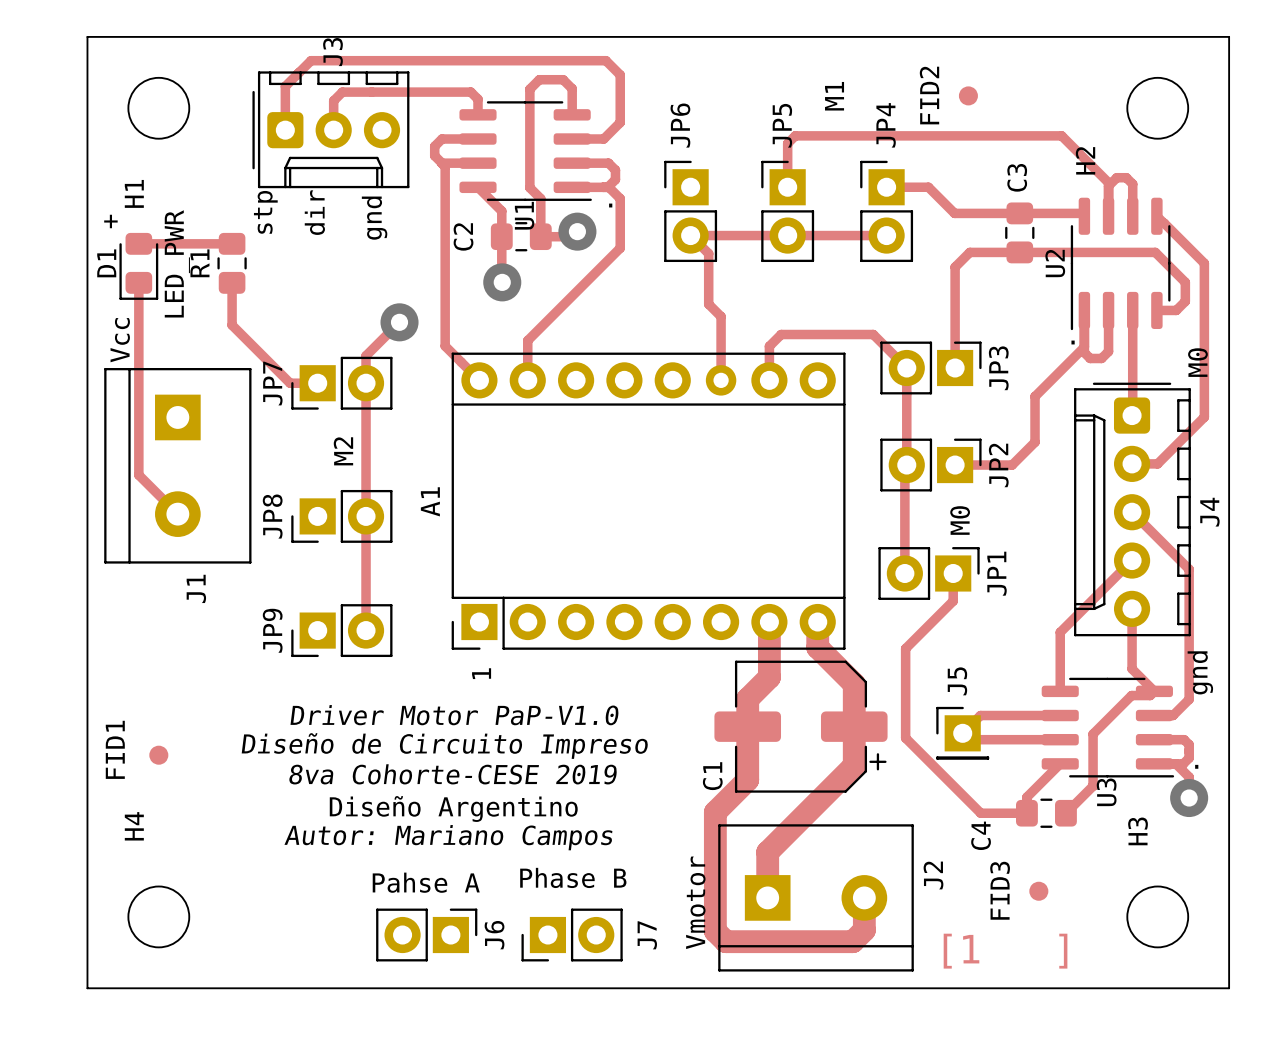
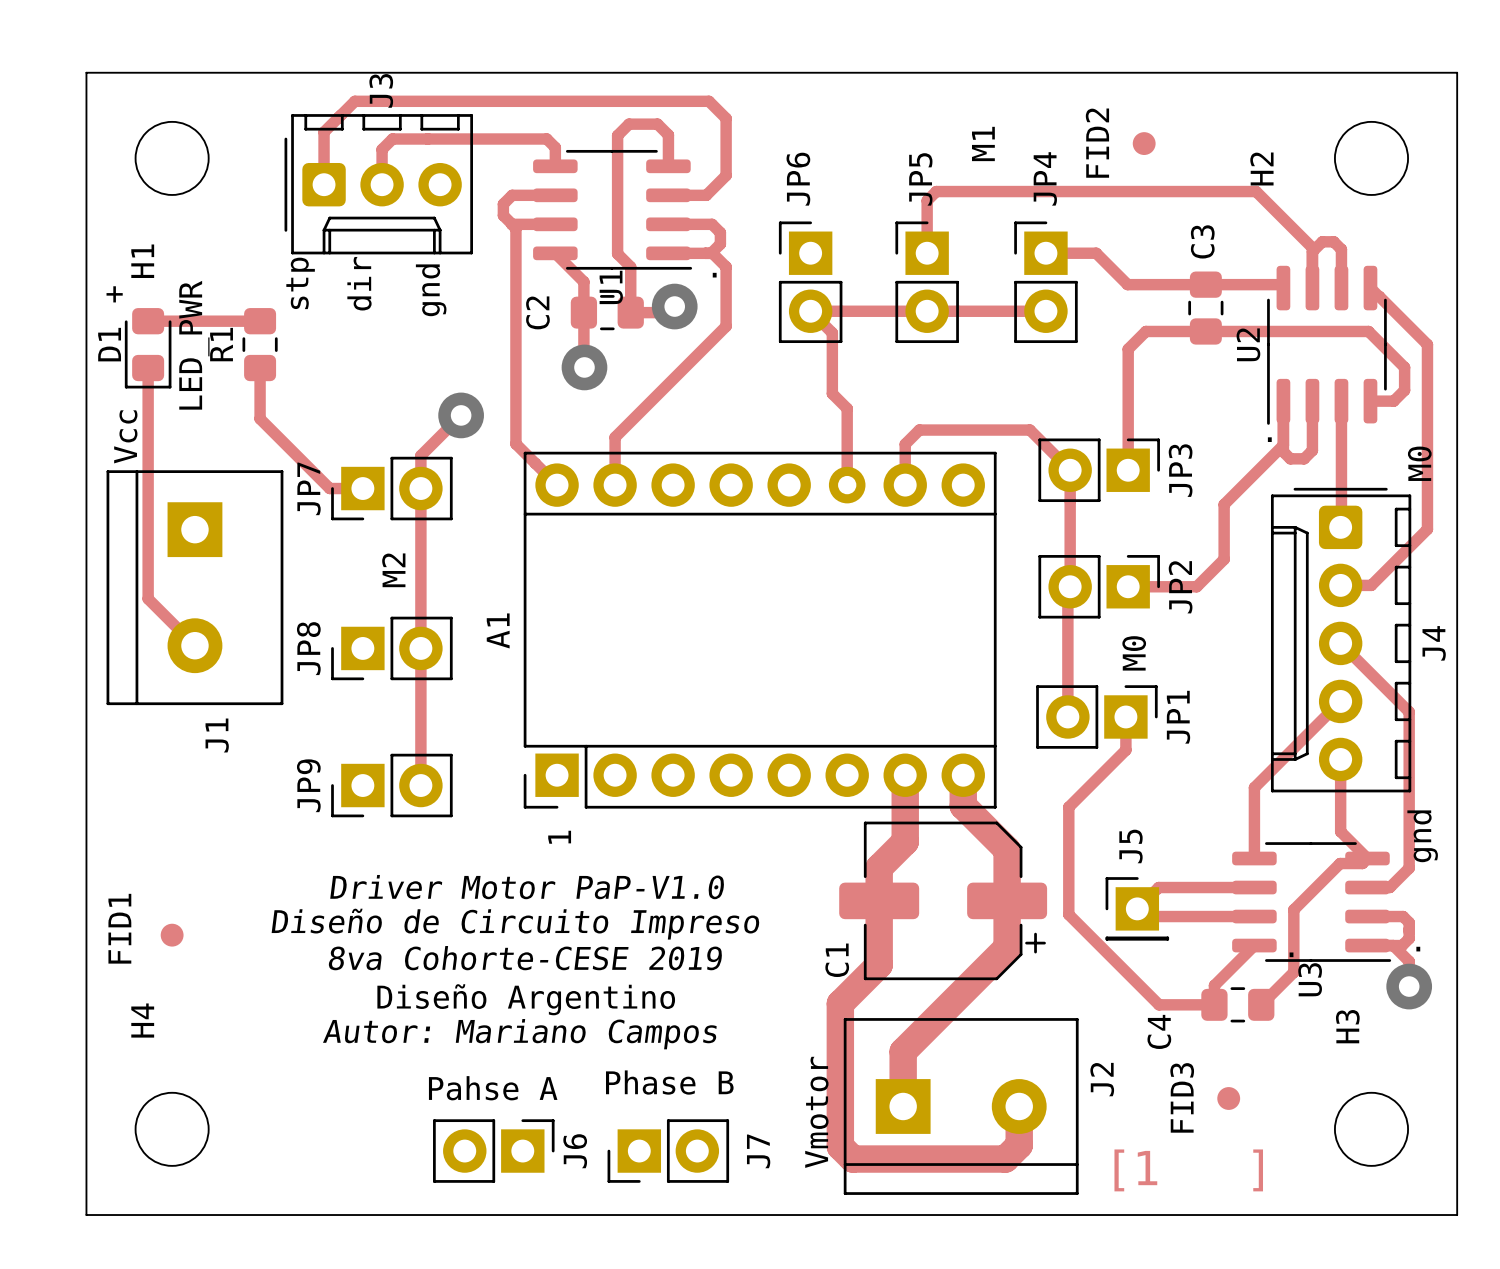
H2 name position: H2 (1085, 160) -> H2 (1261, 168)
text: none -> . (1291, 954)

